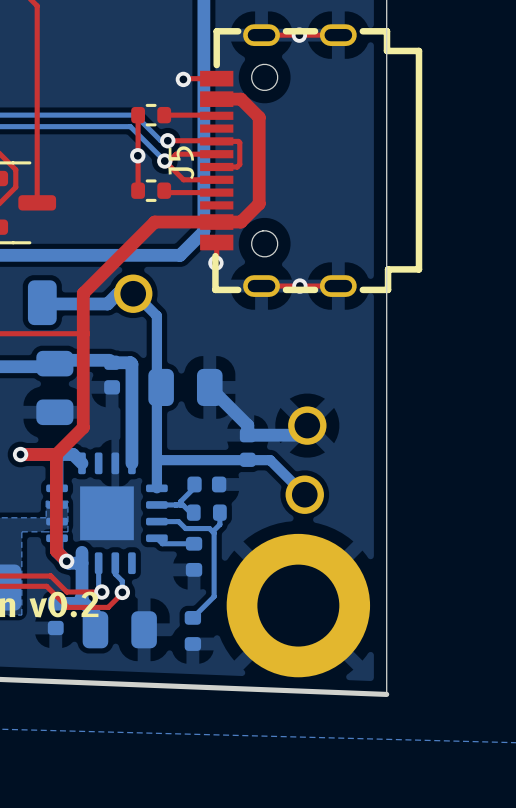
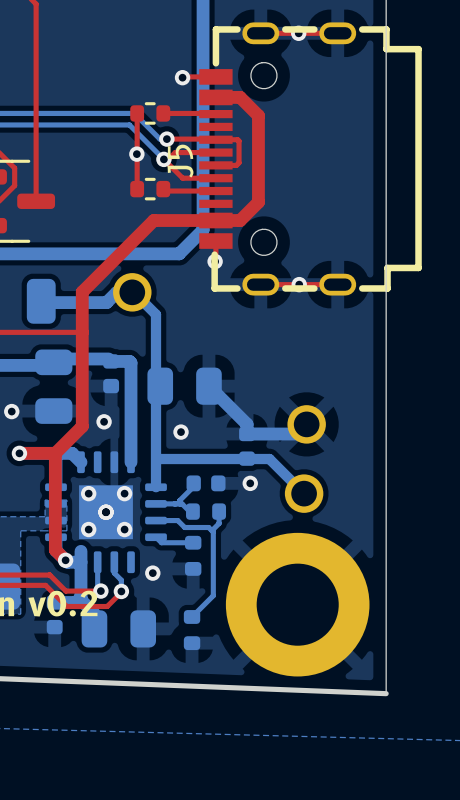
via: none -> (11, 411)
via: none -> (104, 421)
via: none -> (181, 432)
via: none -> (250, 483)
via: none -> (88, 493)
via: none -> (124, 493)
via: none -> (106, 512)
via: none -> (88, 529)
via: none -> (124, 529)
via: none -> (152, 573)

